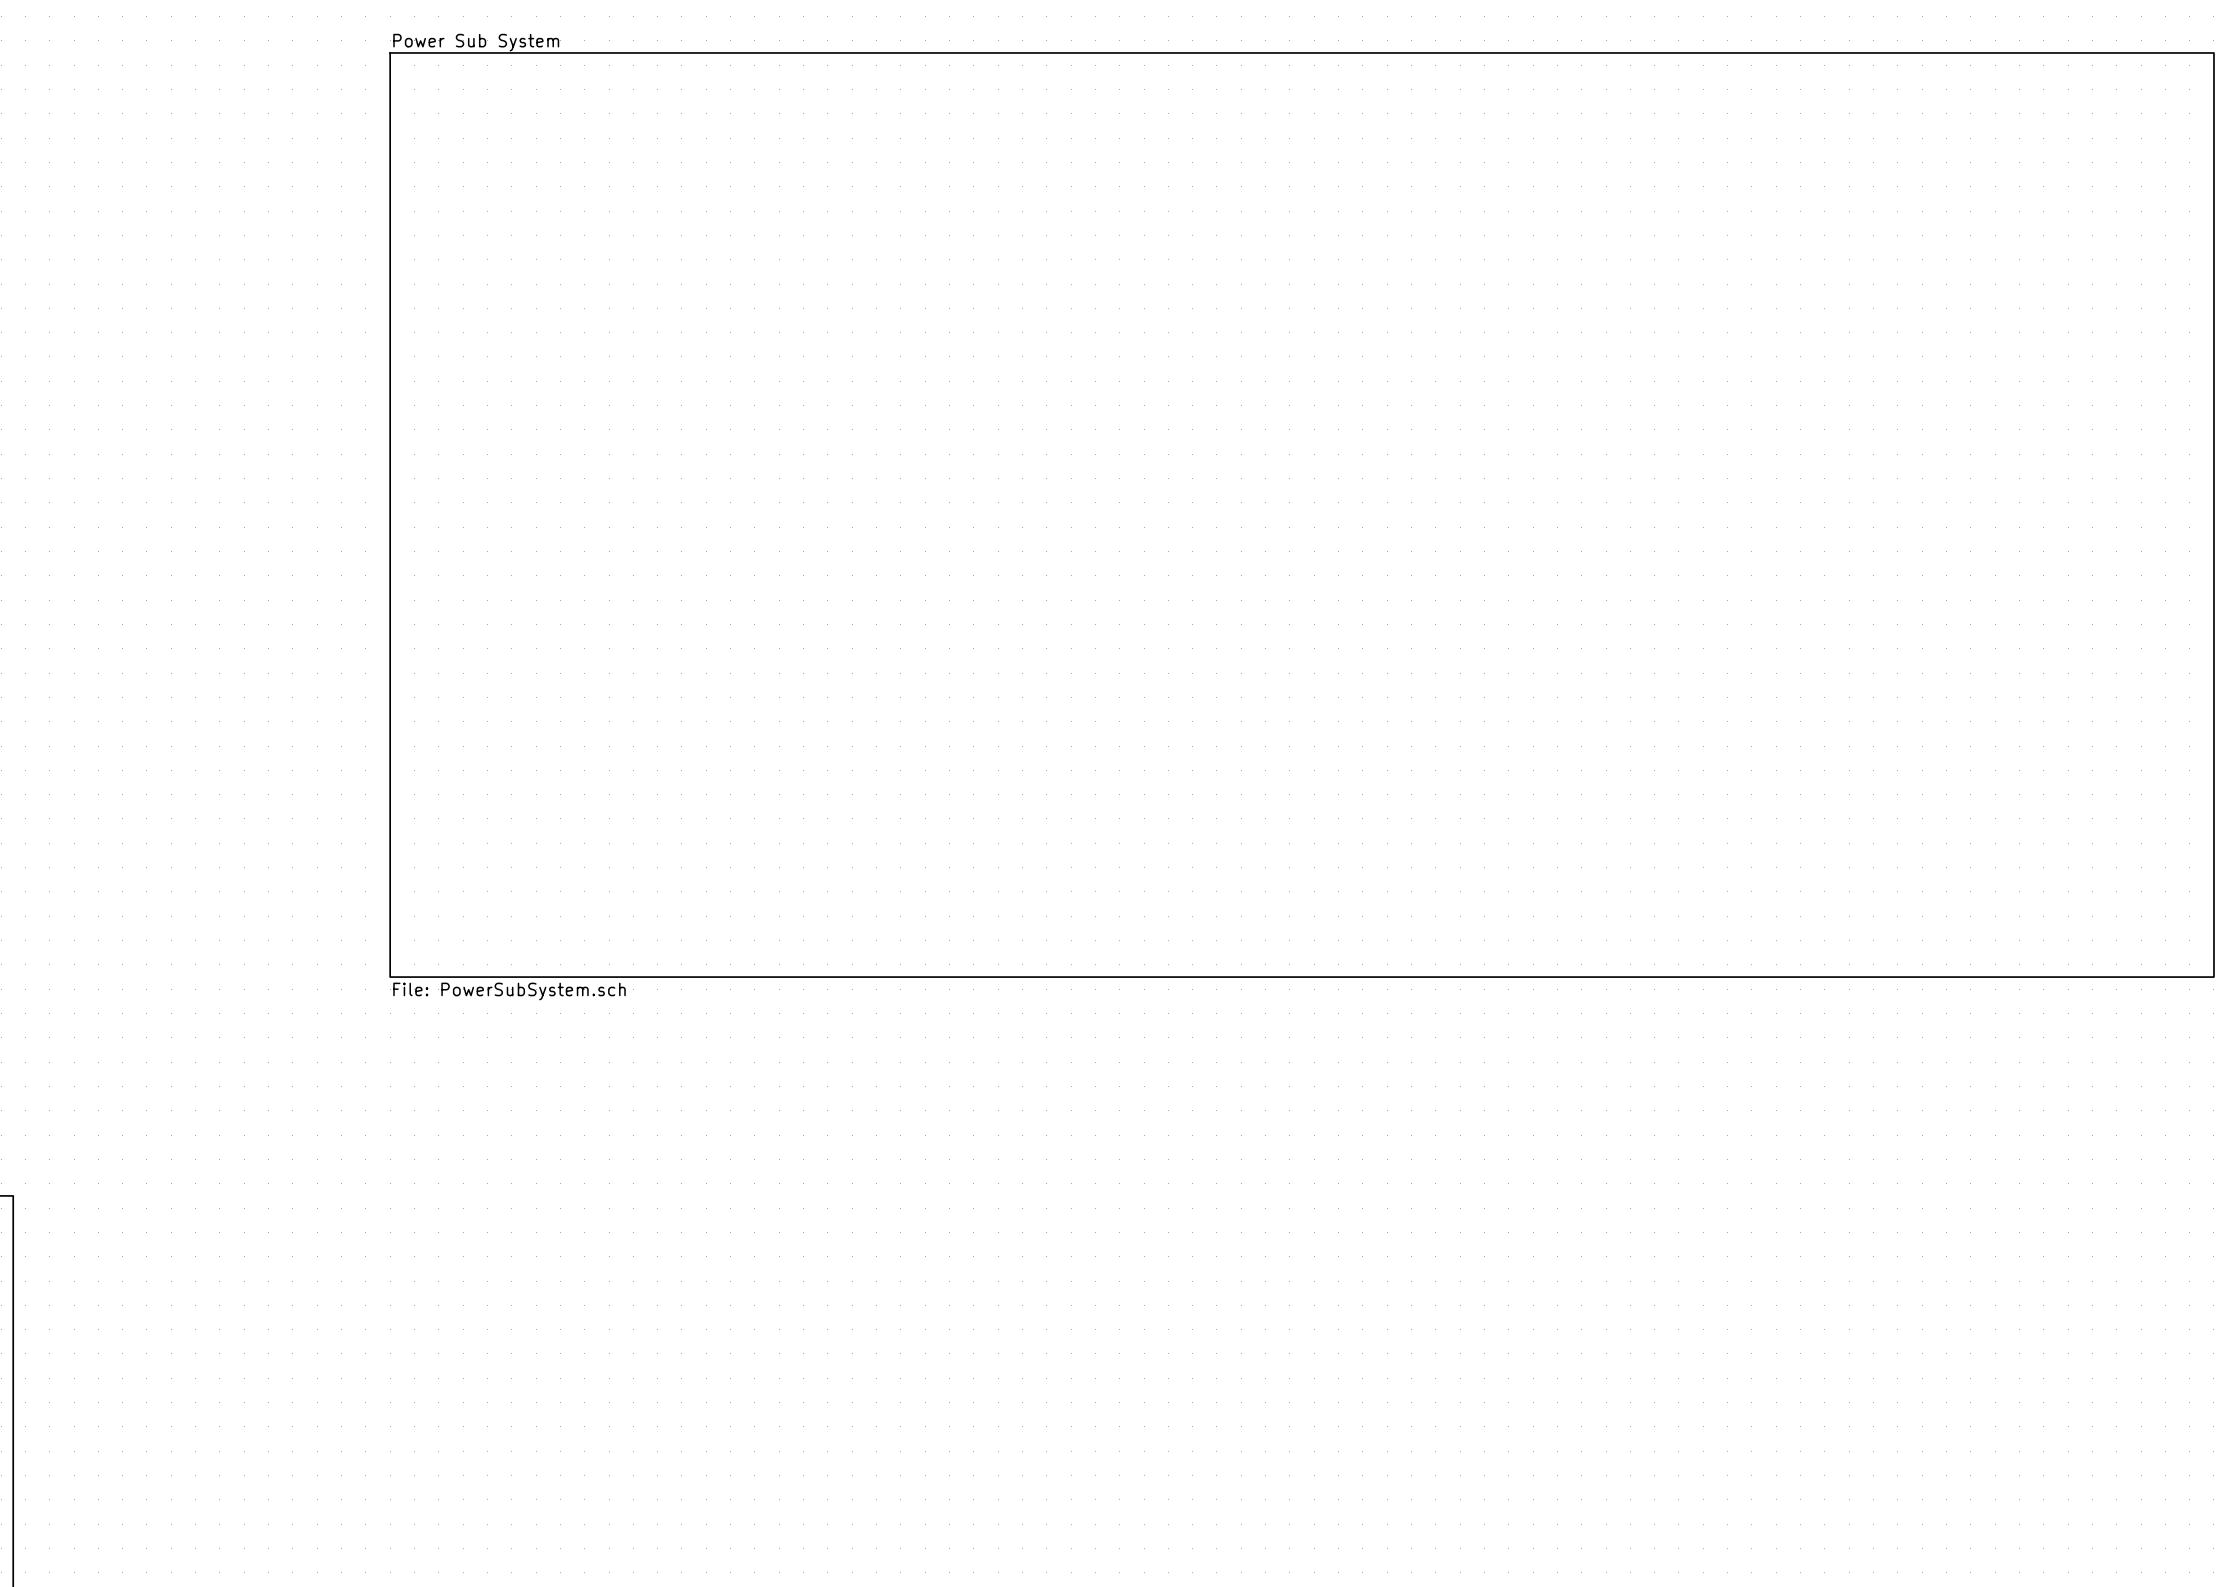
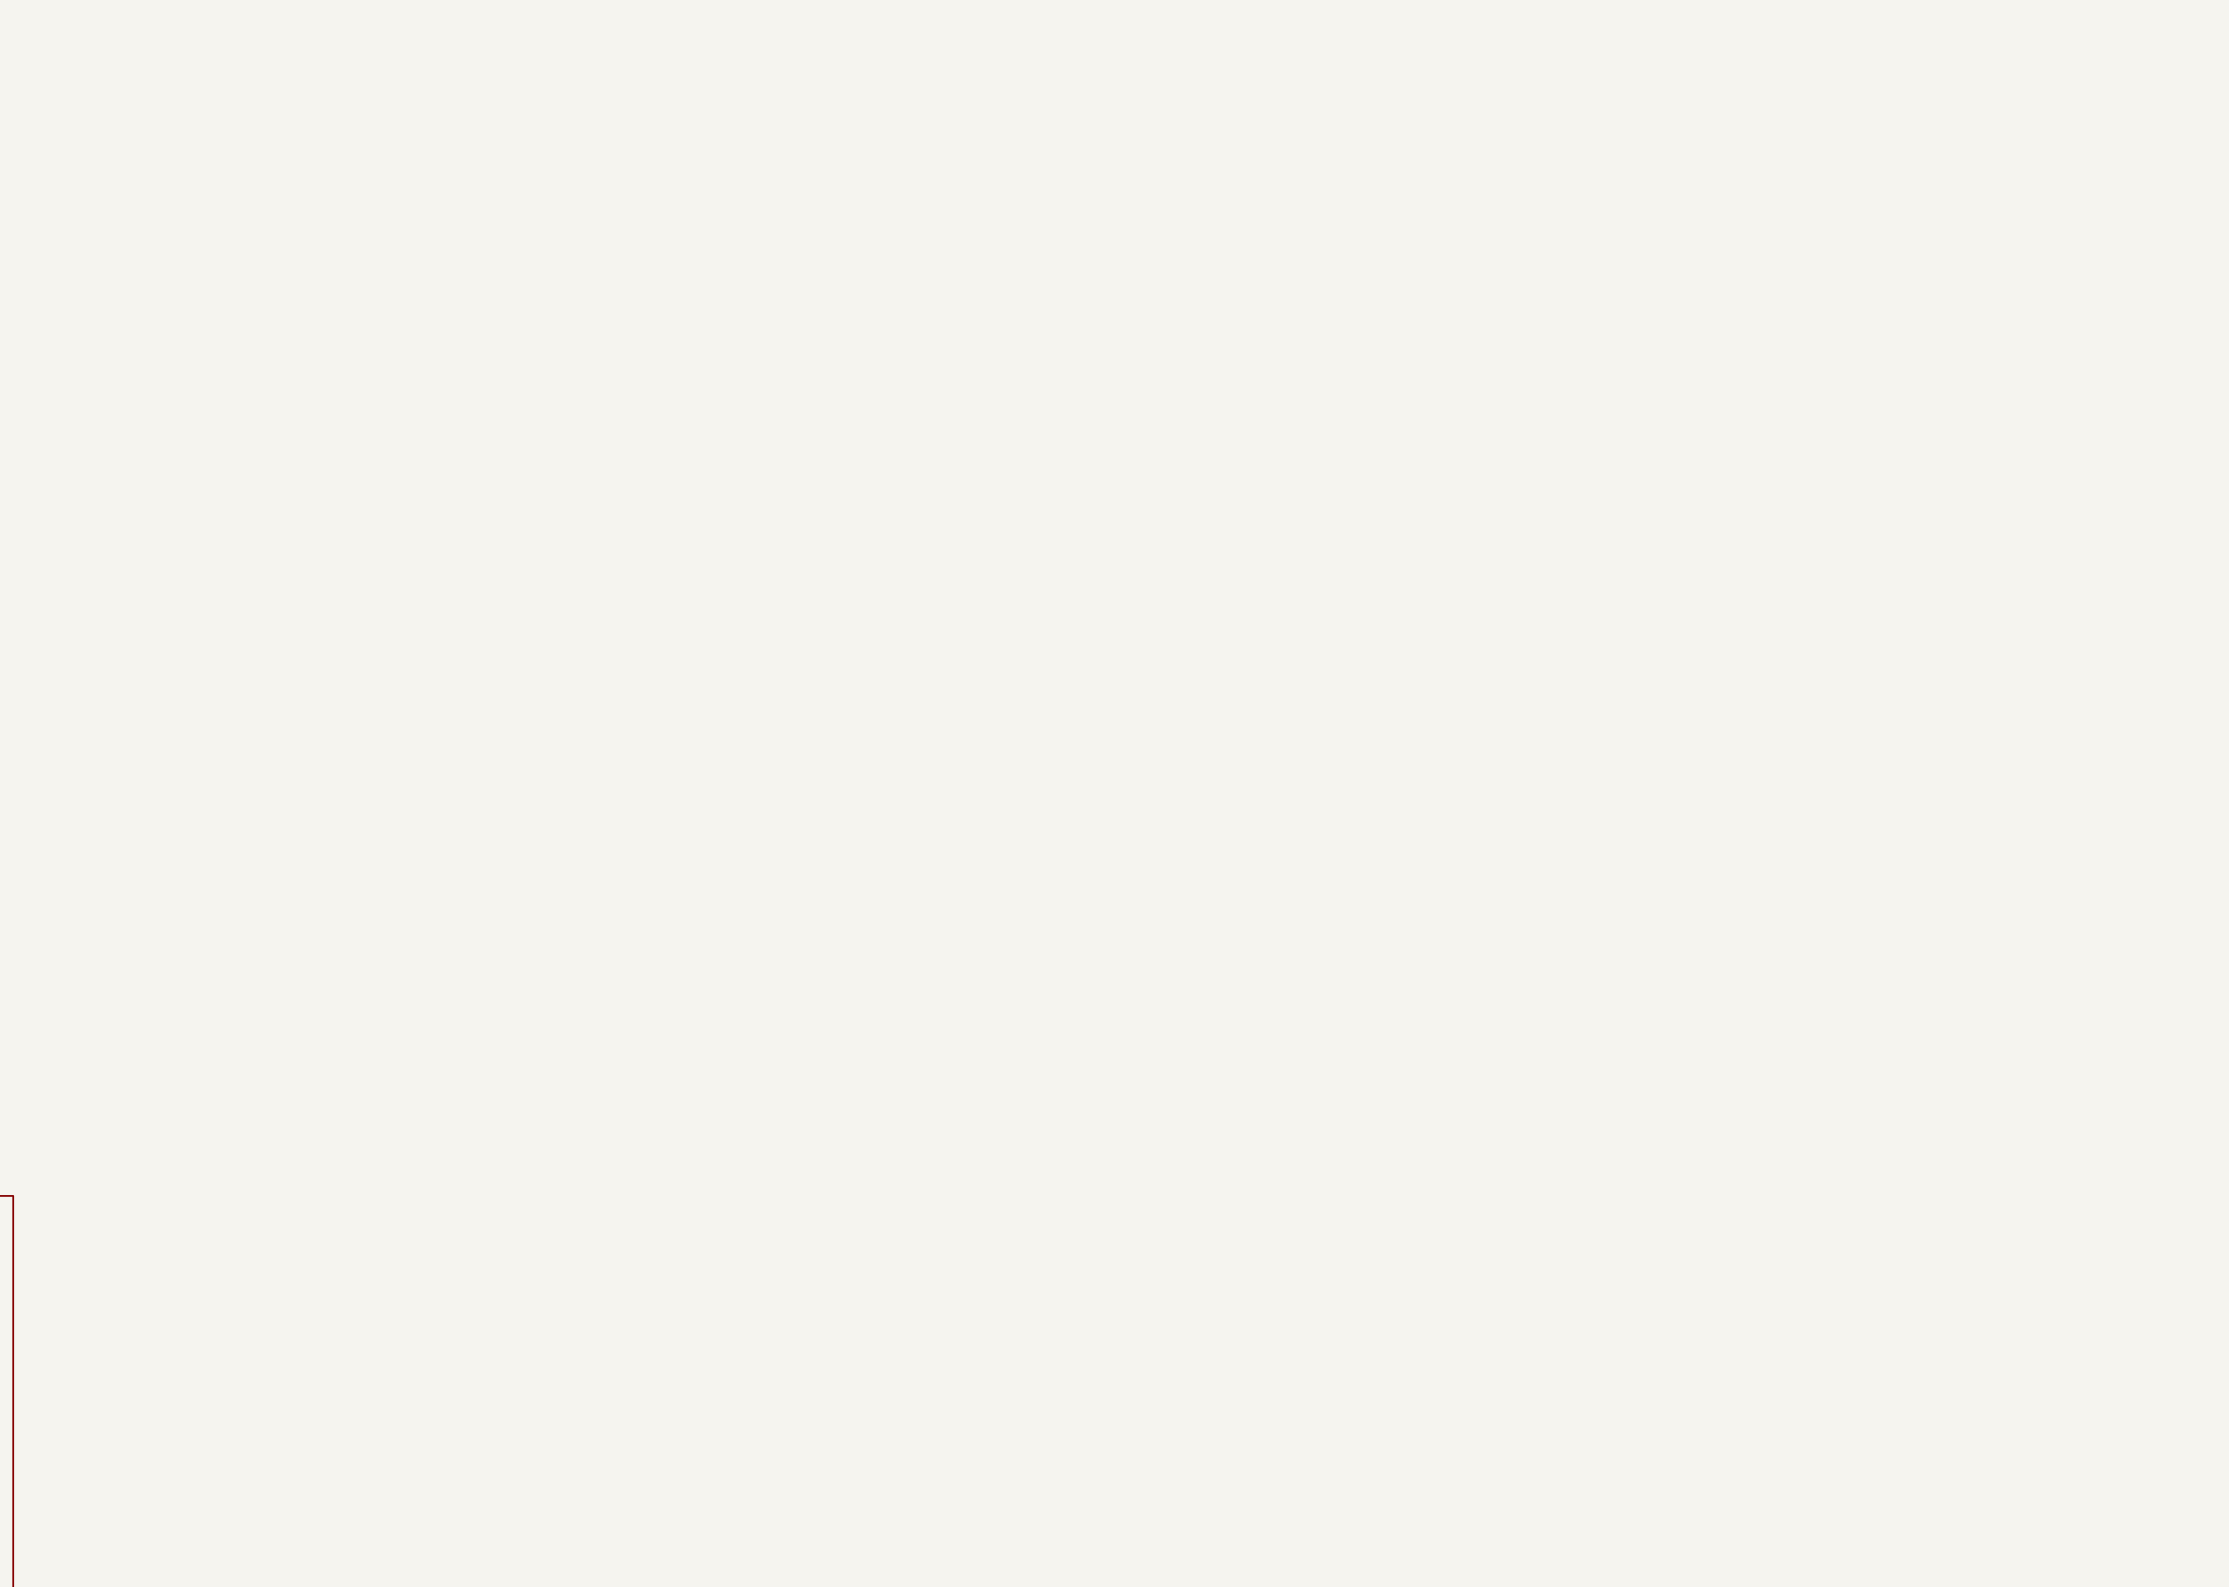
sheet Power Sub System: File: PowerSubSystem.sch (1302, 515) -> none

